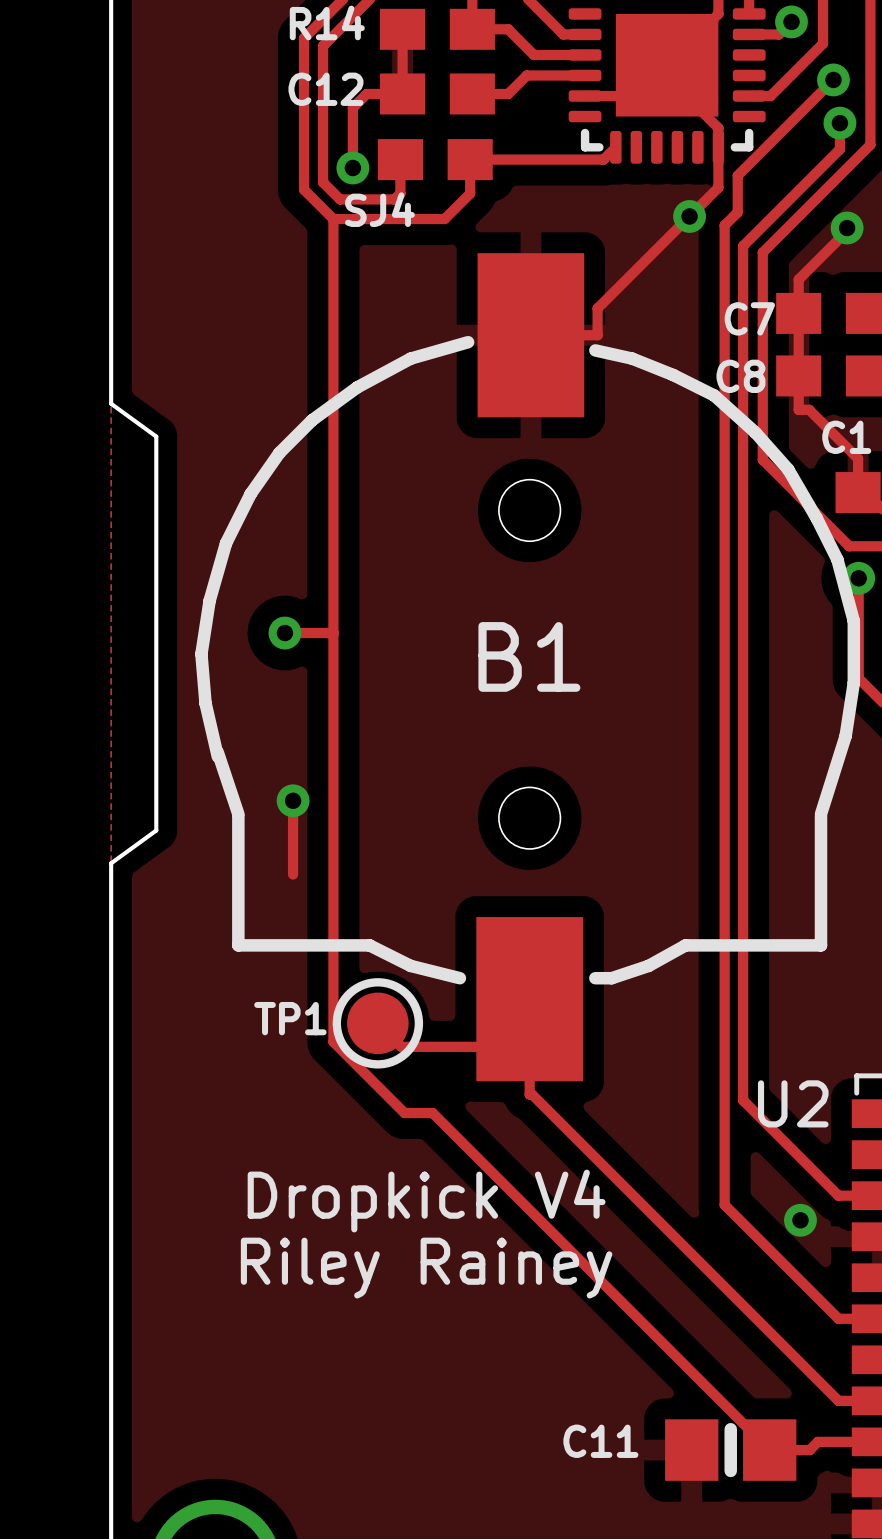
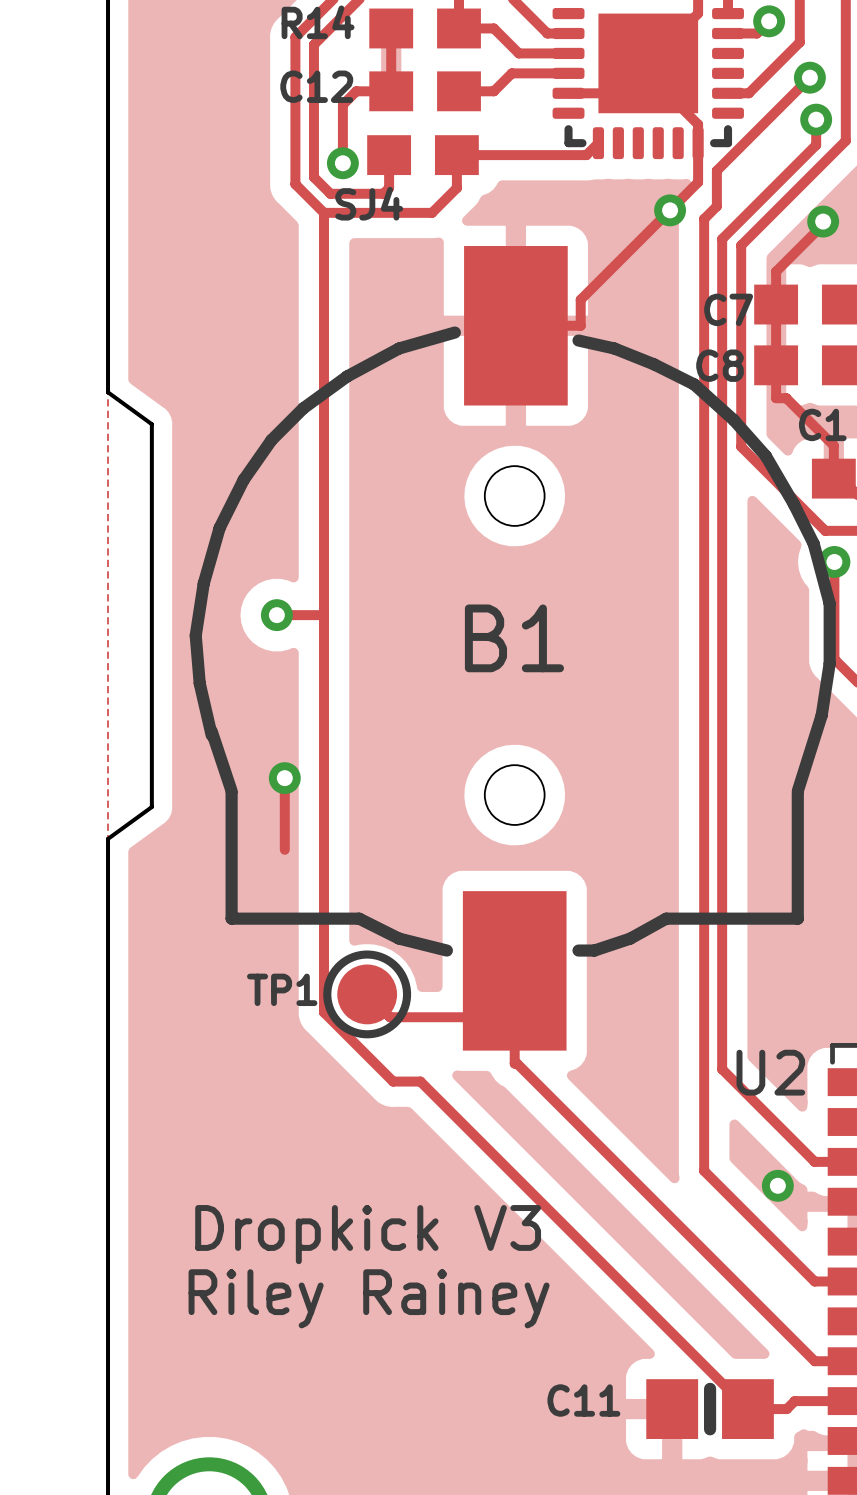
text: Dropkick V4 (426, 1201) -> Dropkick V3 (368, 1234)
text position: Riley Rainey (426, 1268) -> Riley Rainey (369, 1298)

